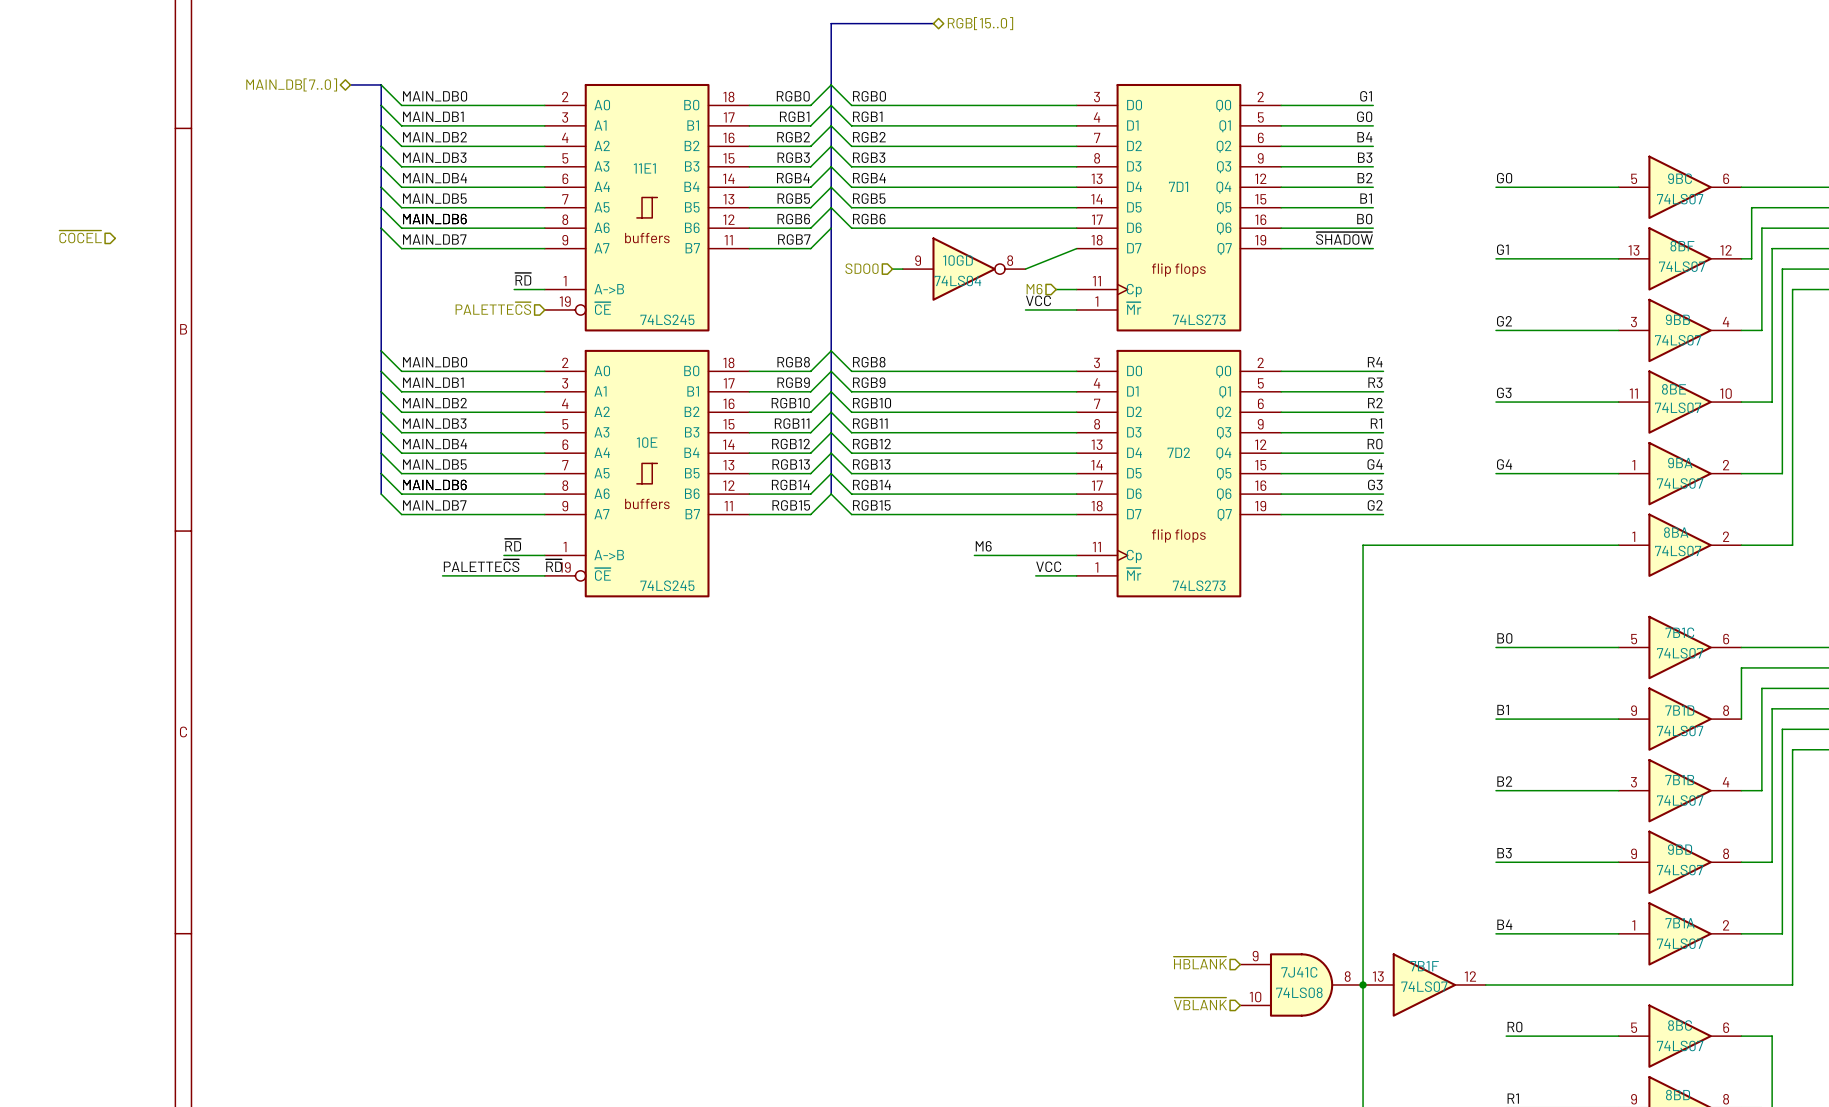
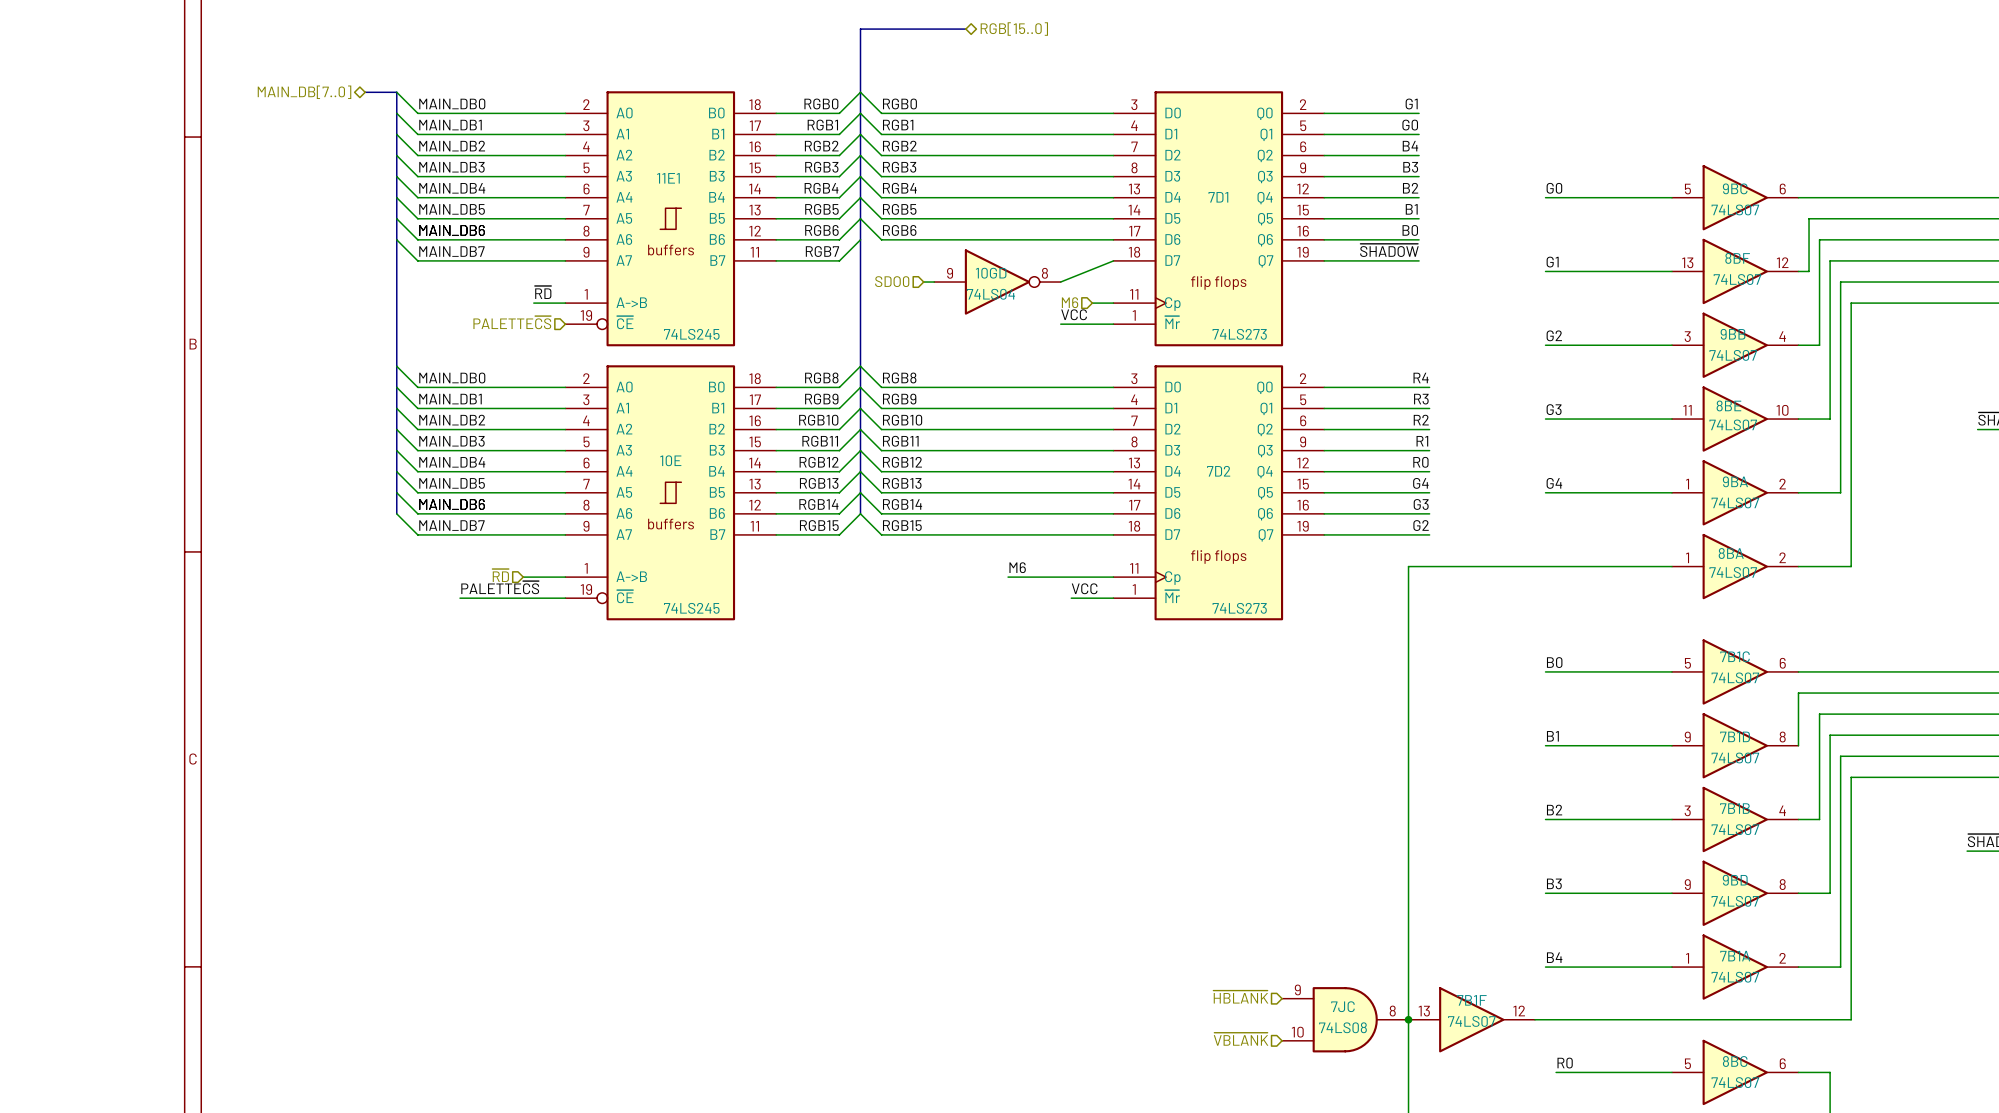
hierarchical label: ~{COCEL} (80, 236) -> none
label: ~{RD} (512, 545) -> none
hierarchical label: none -> ~{RD} (500, 575)
label: ~{RD} (553, 565) -> none
7J41C name: 7J41C (1299, 972) -> 7JC (1342, 1006)

